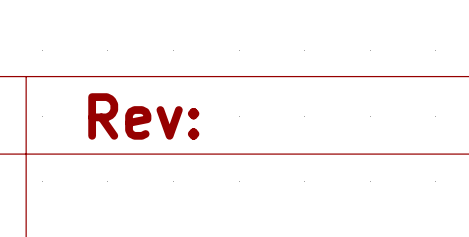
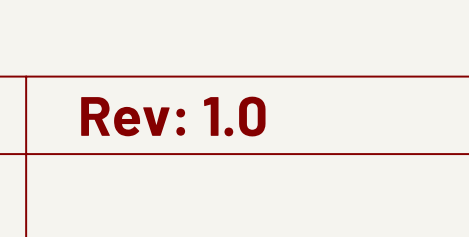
title block: Rev: (143, 116) -> Rev: 1.0 (173, 116)

